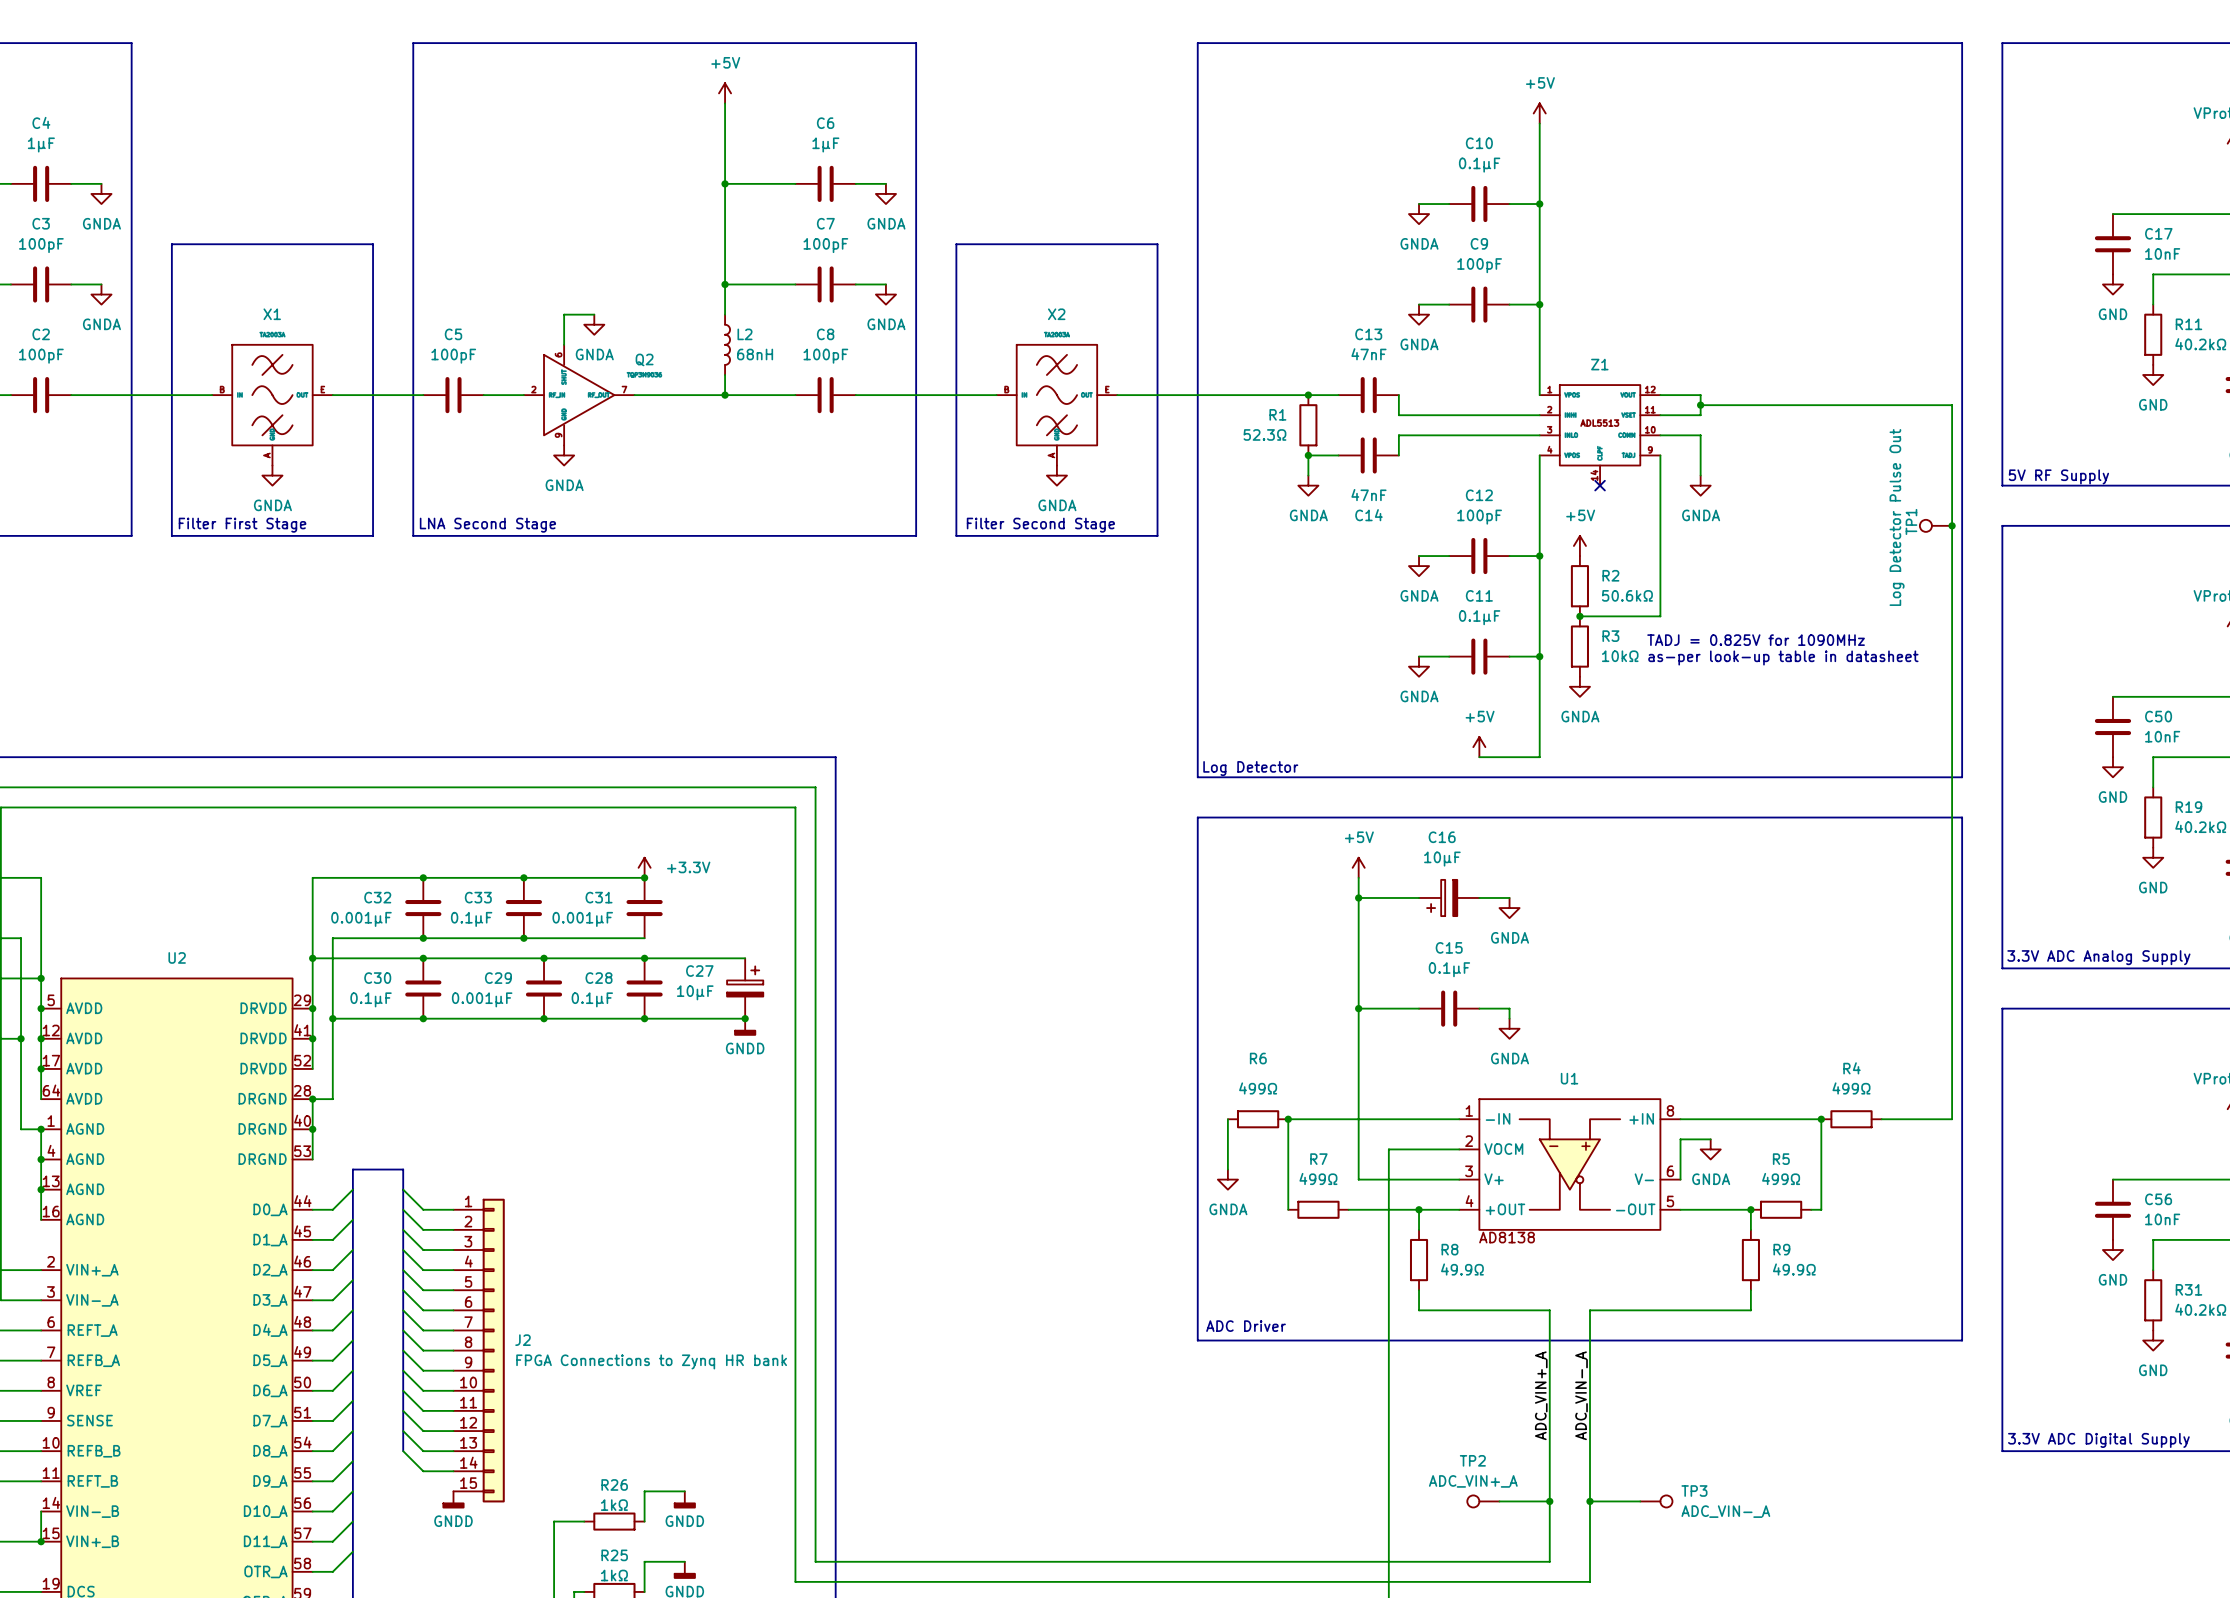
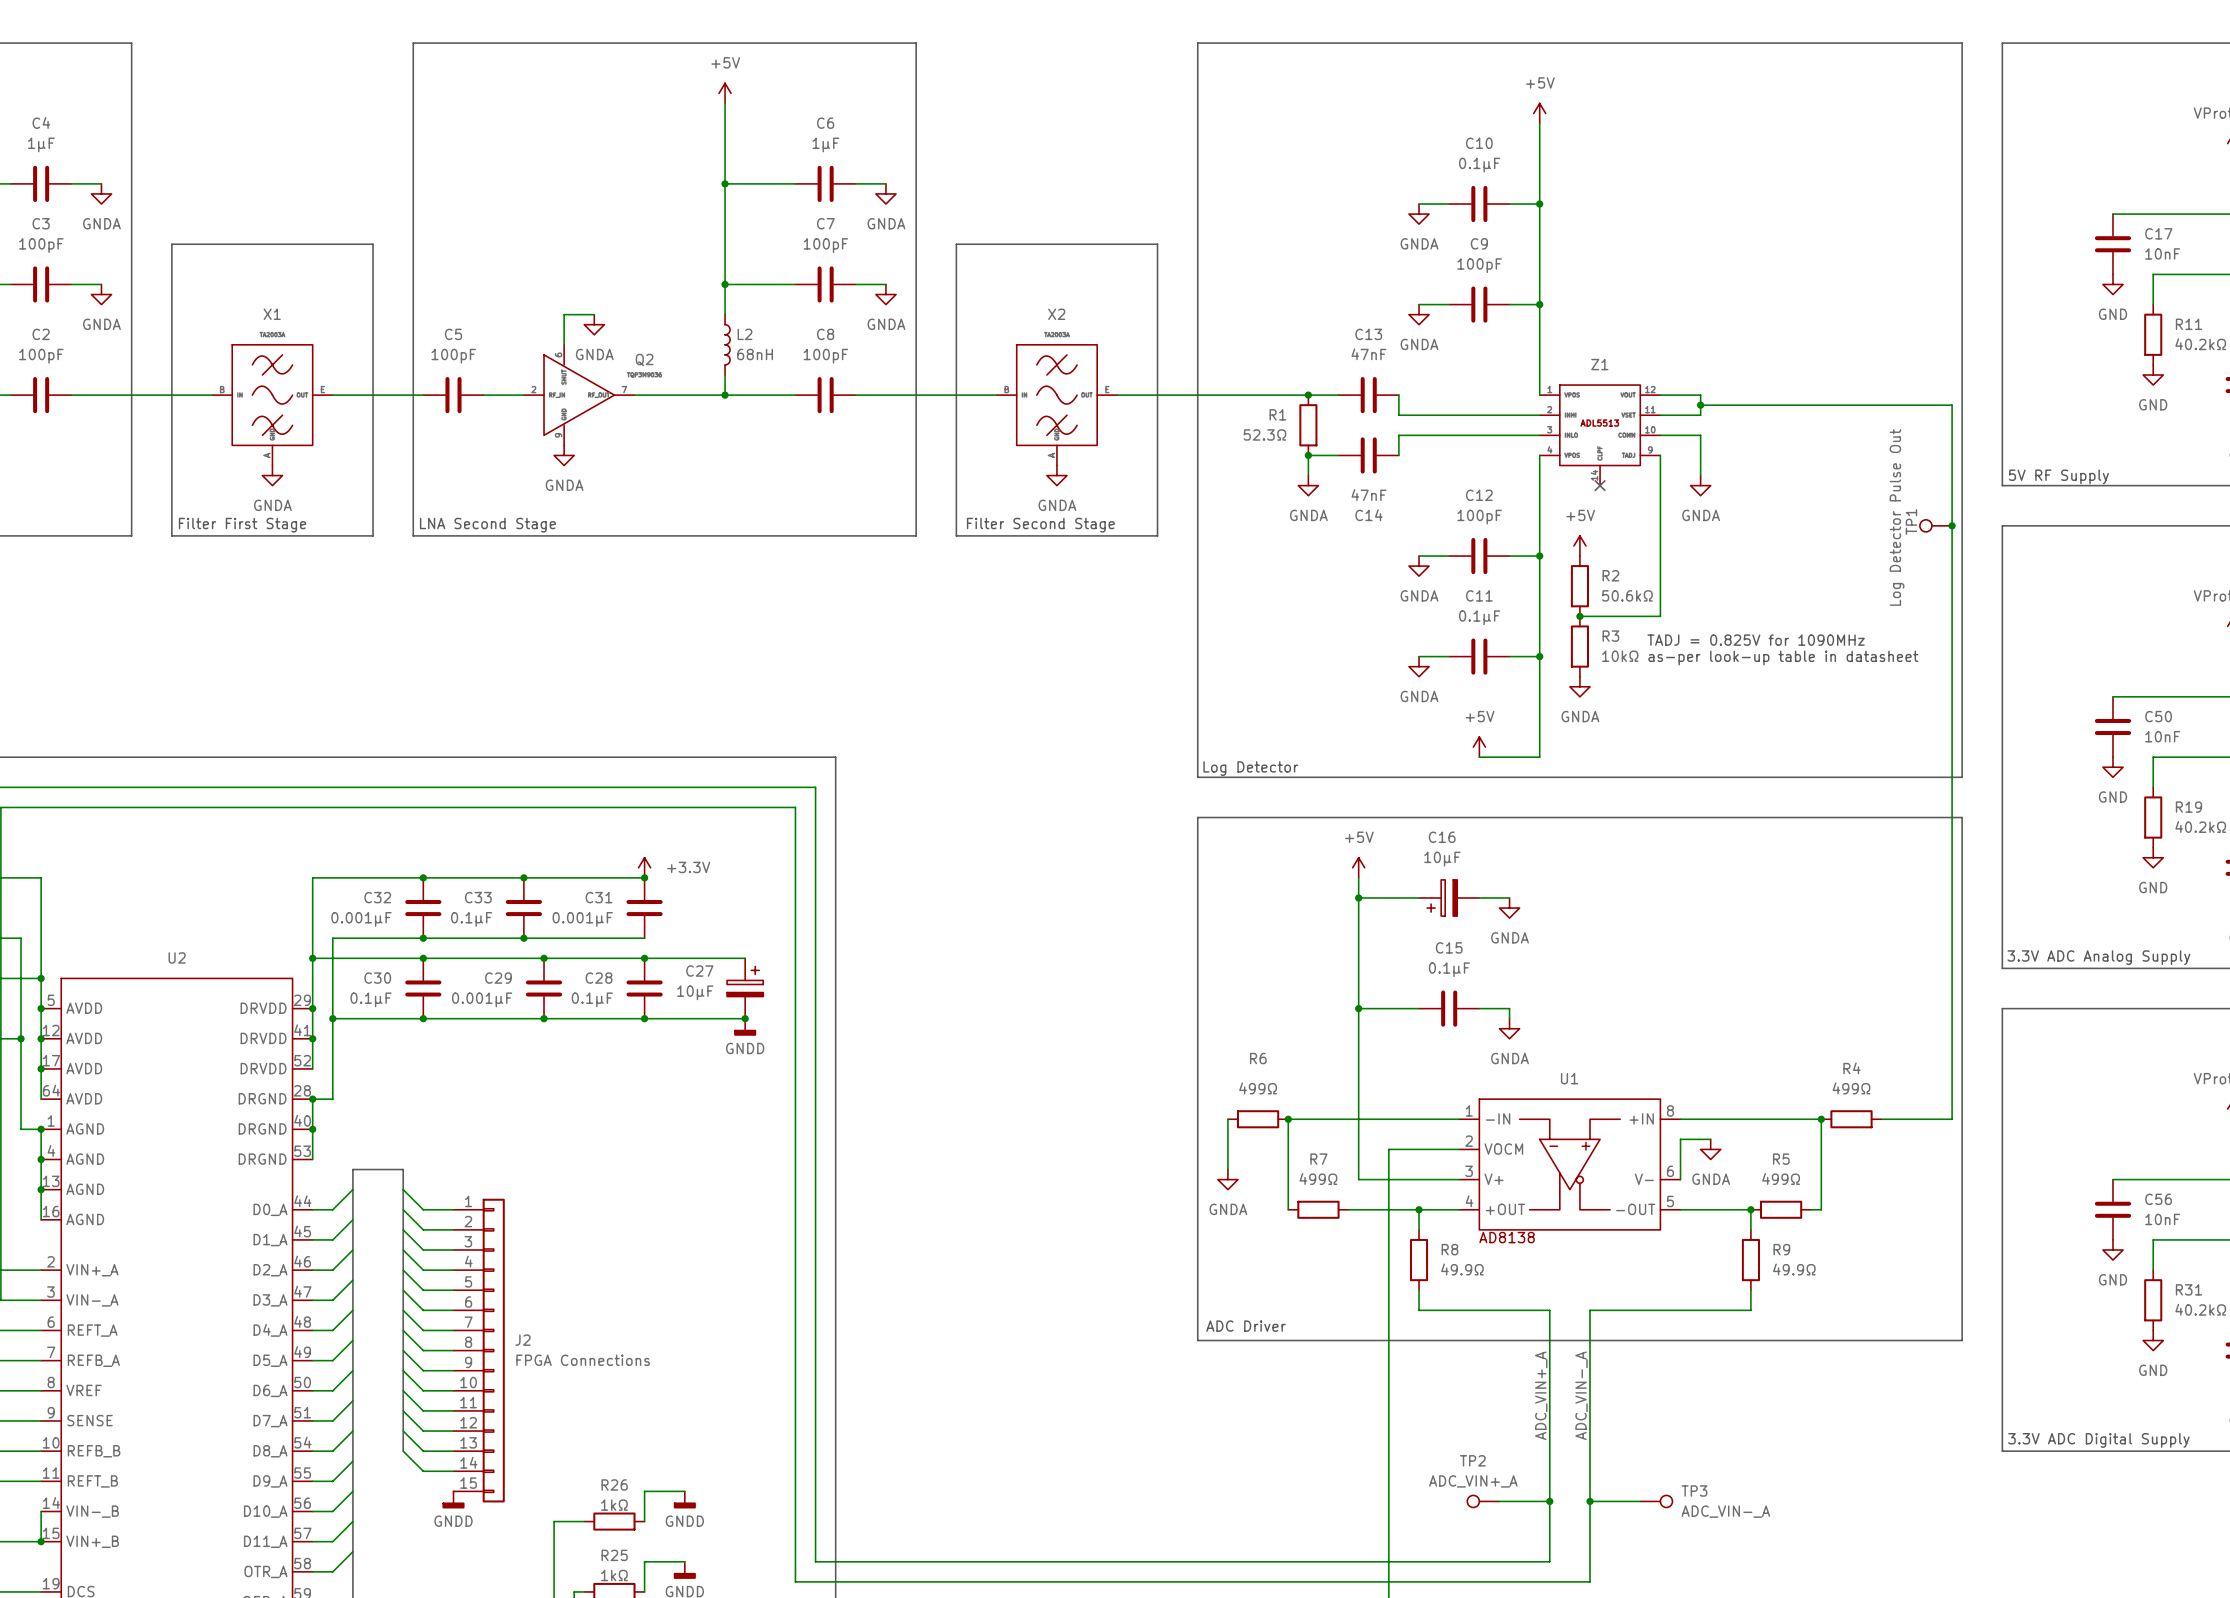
J2 value: FPGA Connections to Zynq HR bank (651, 1361) -> FPGA Connections (583, 1360)

